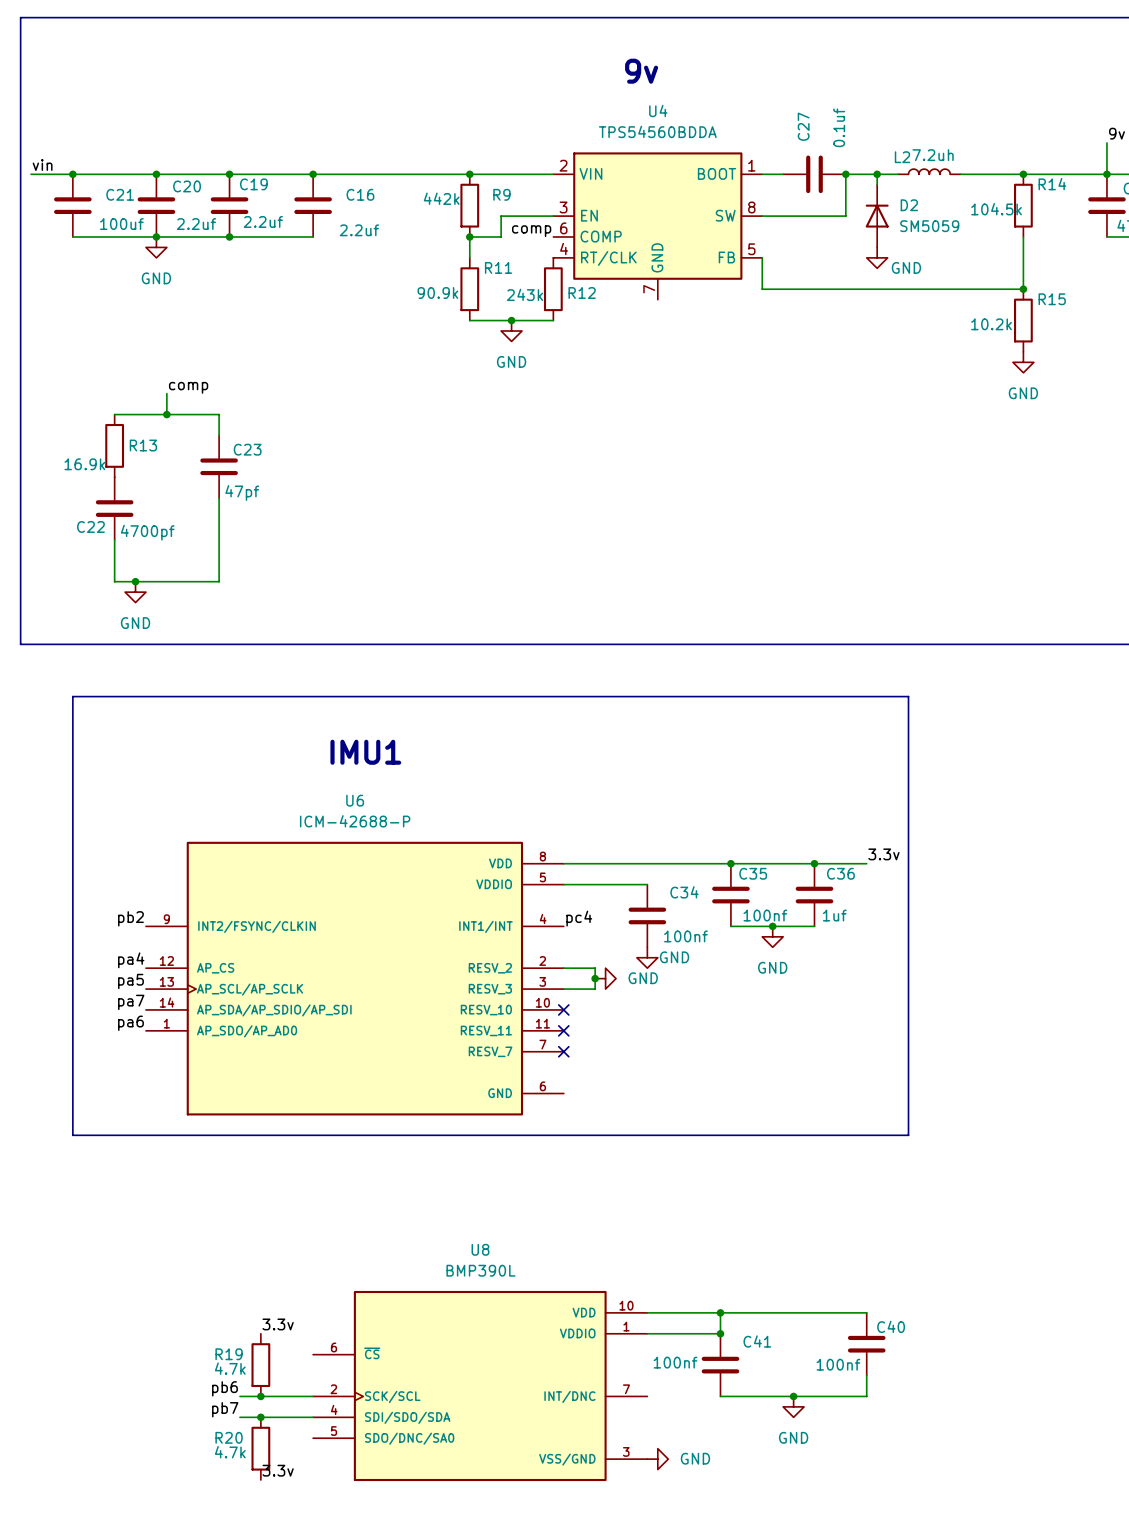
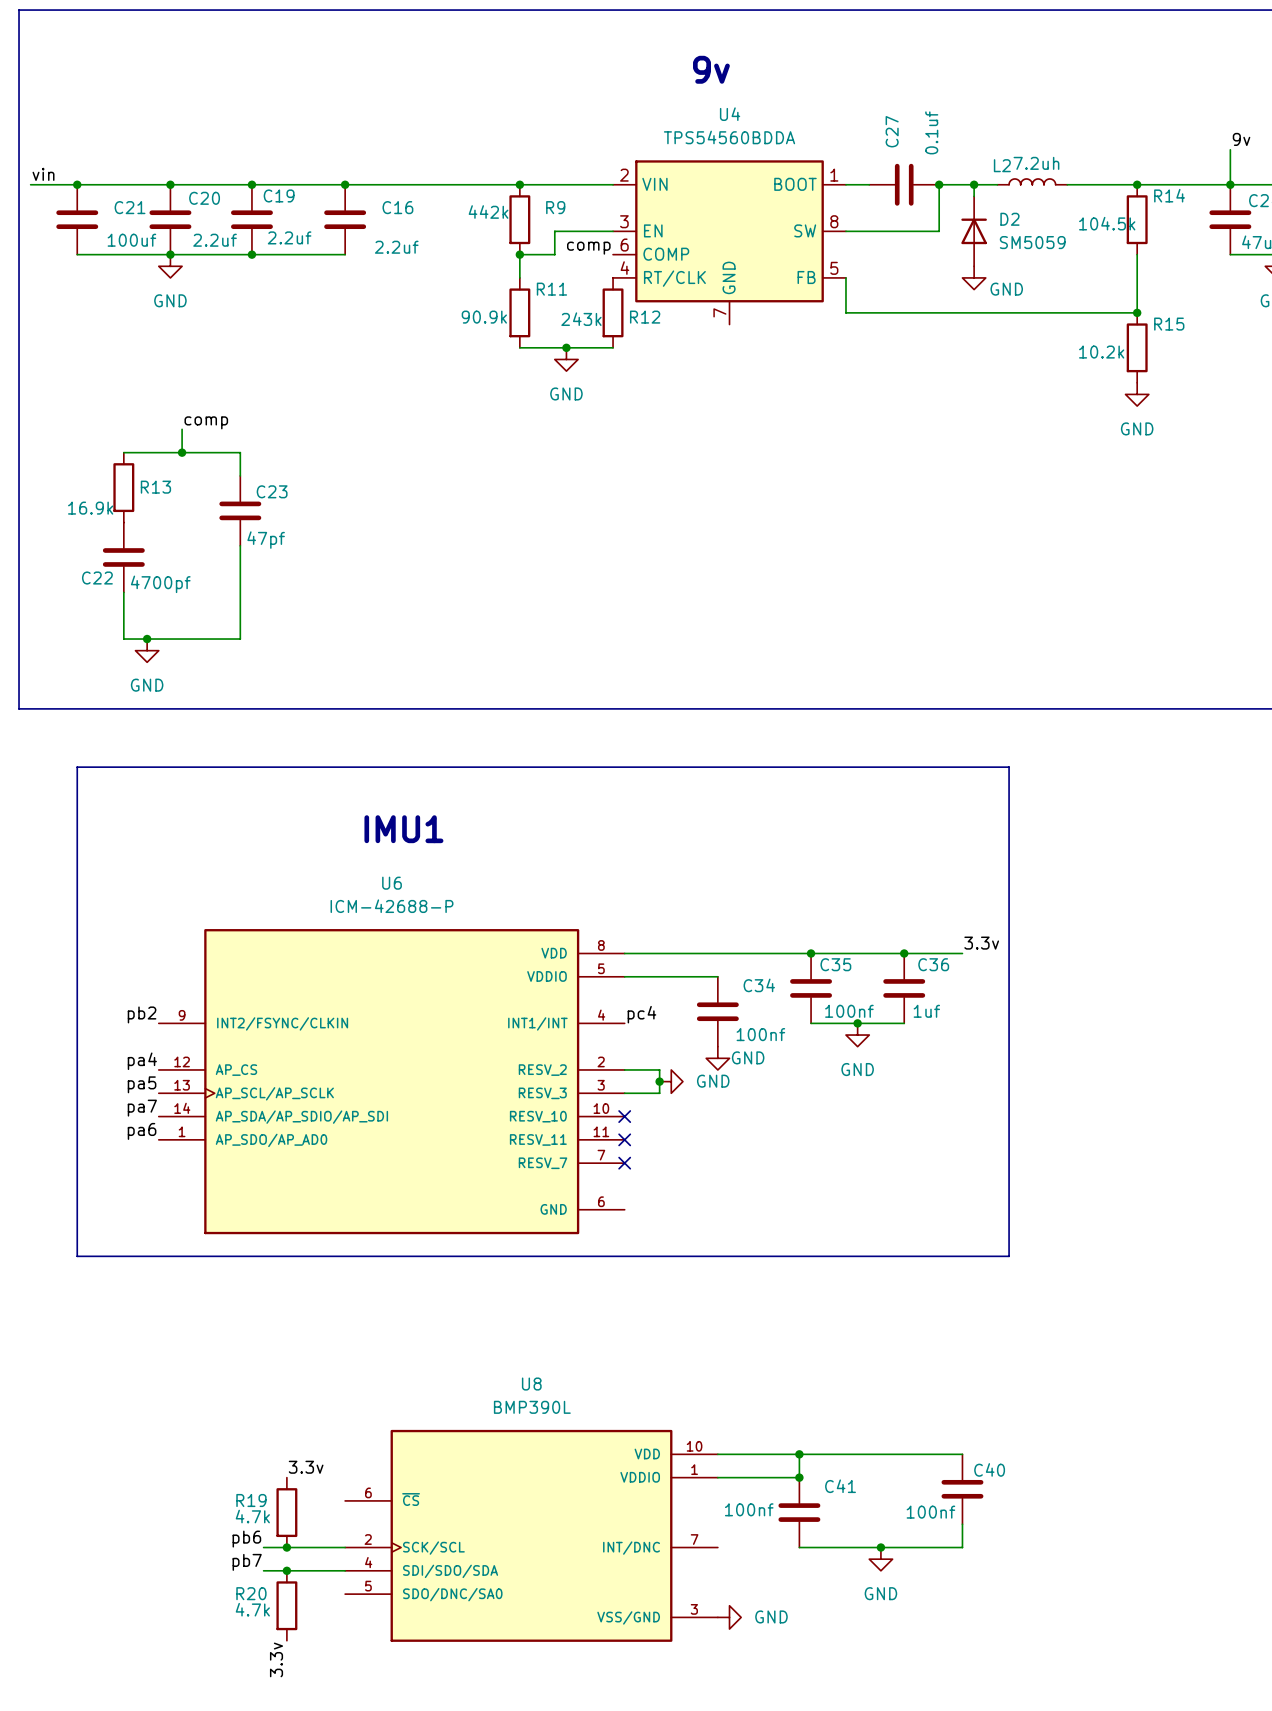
label rotation: 0° (278, 1470) -> 90° counterclockwise (276, 1659)

